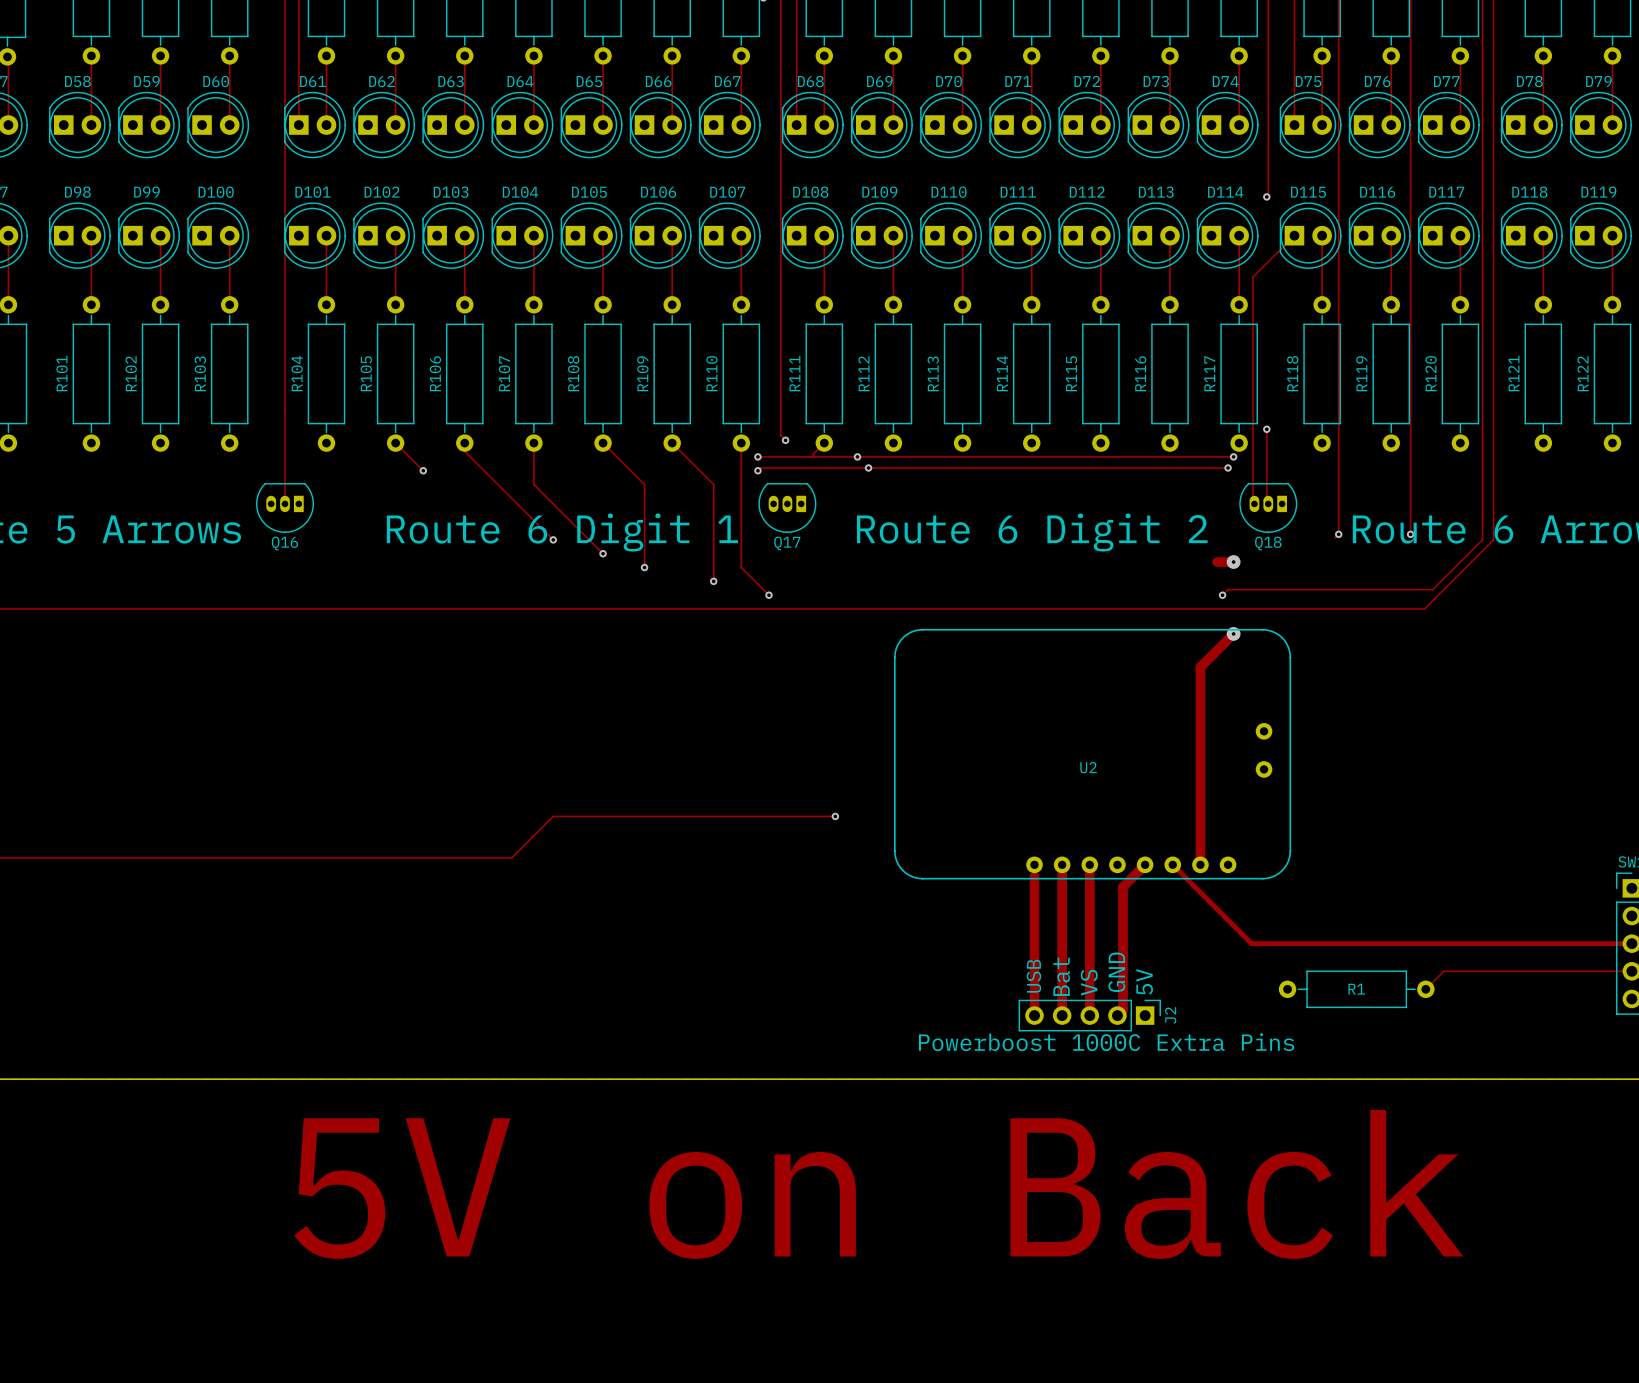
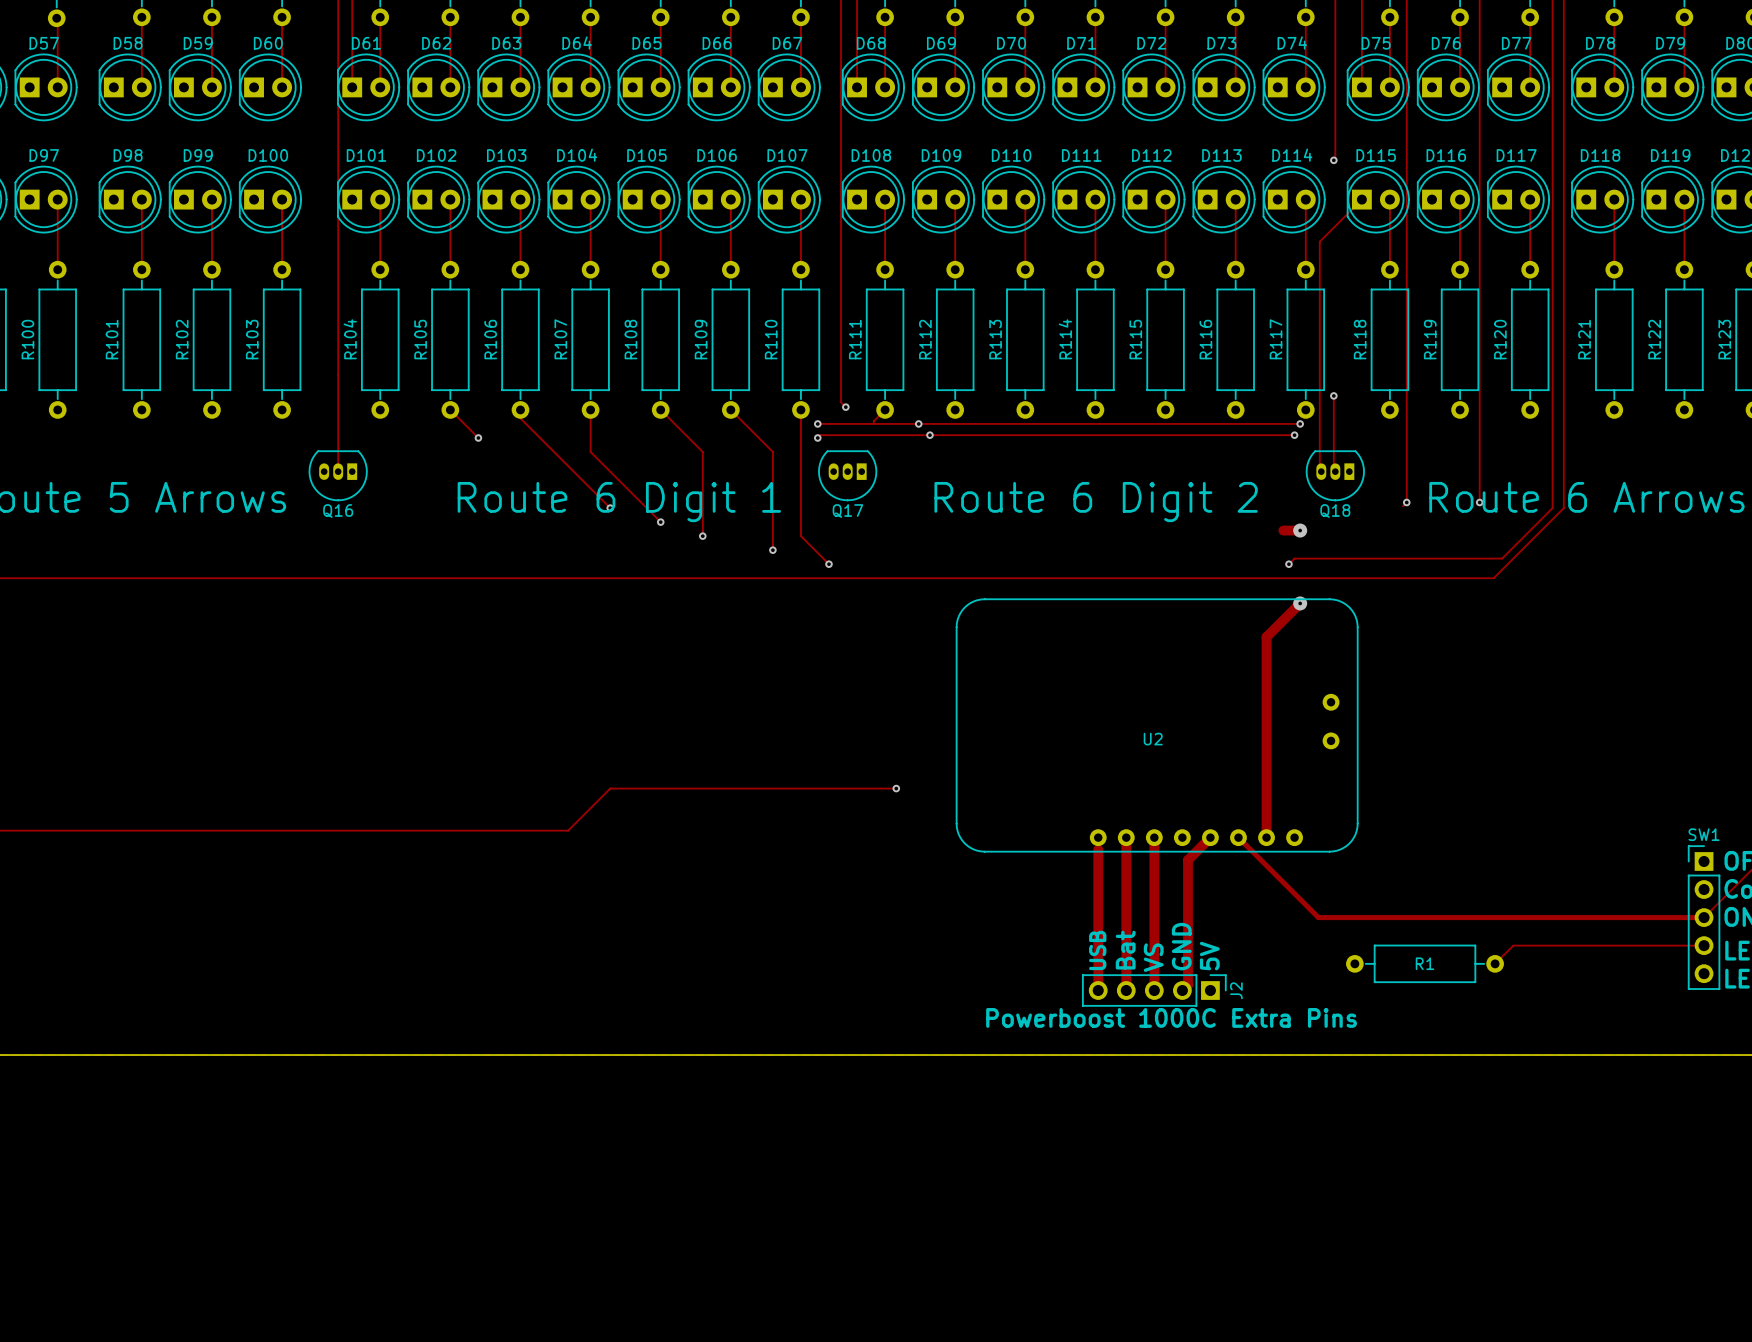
text: 5V on Back (878, 1184) -> none

